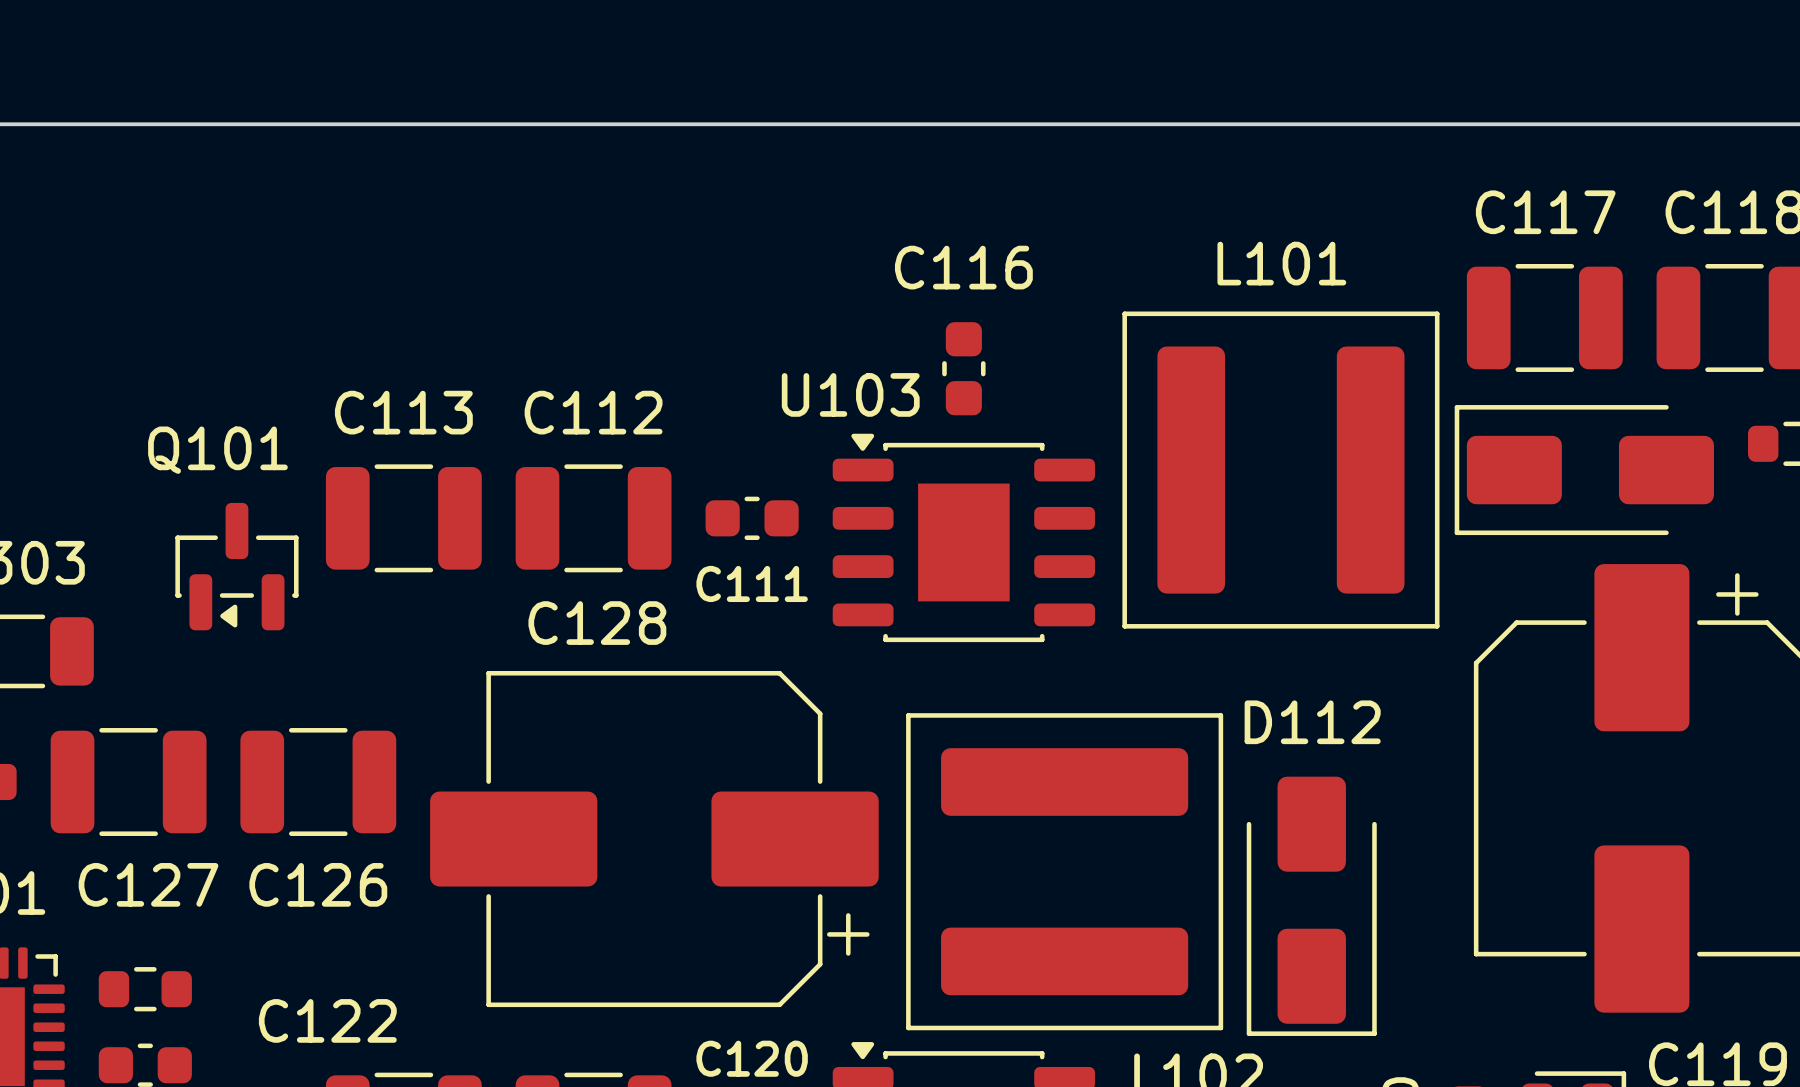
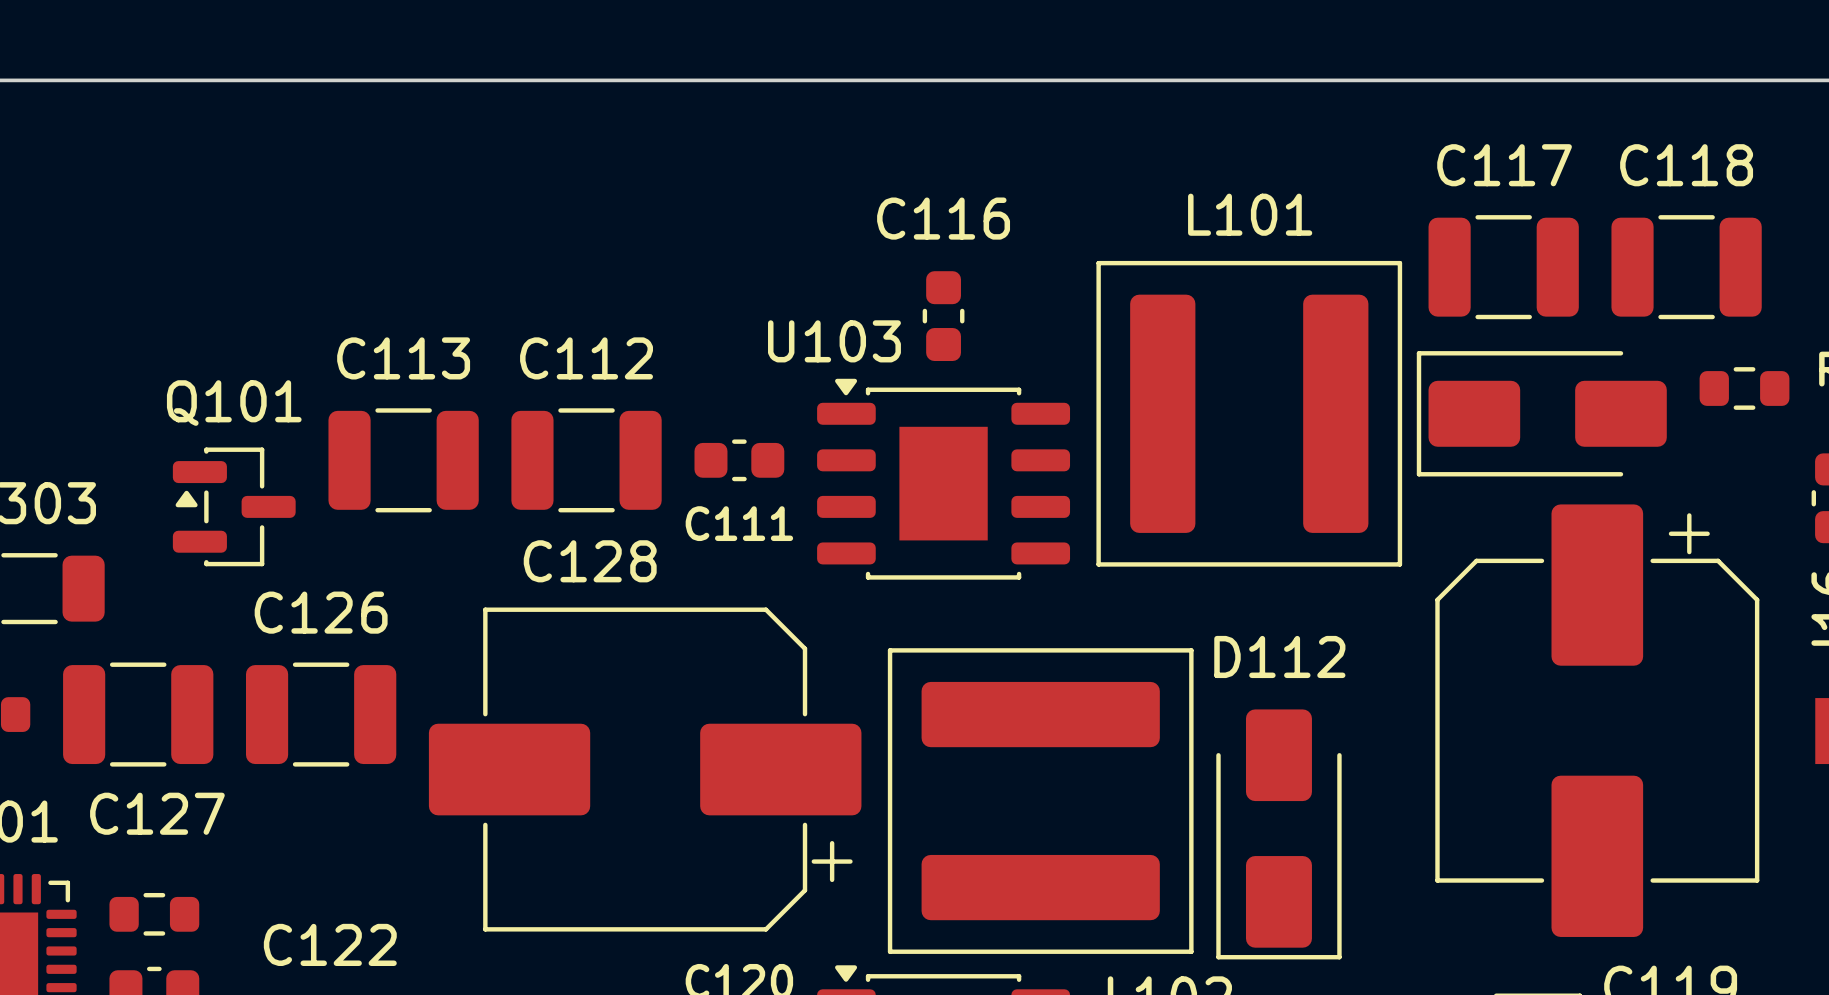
Q101 rotation: 0° (236, 566) -> 90° clockwise (234, 506)
C126 name position: C126 (318, 884) -> C126 (321, 612)

